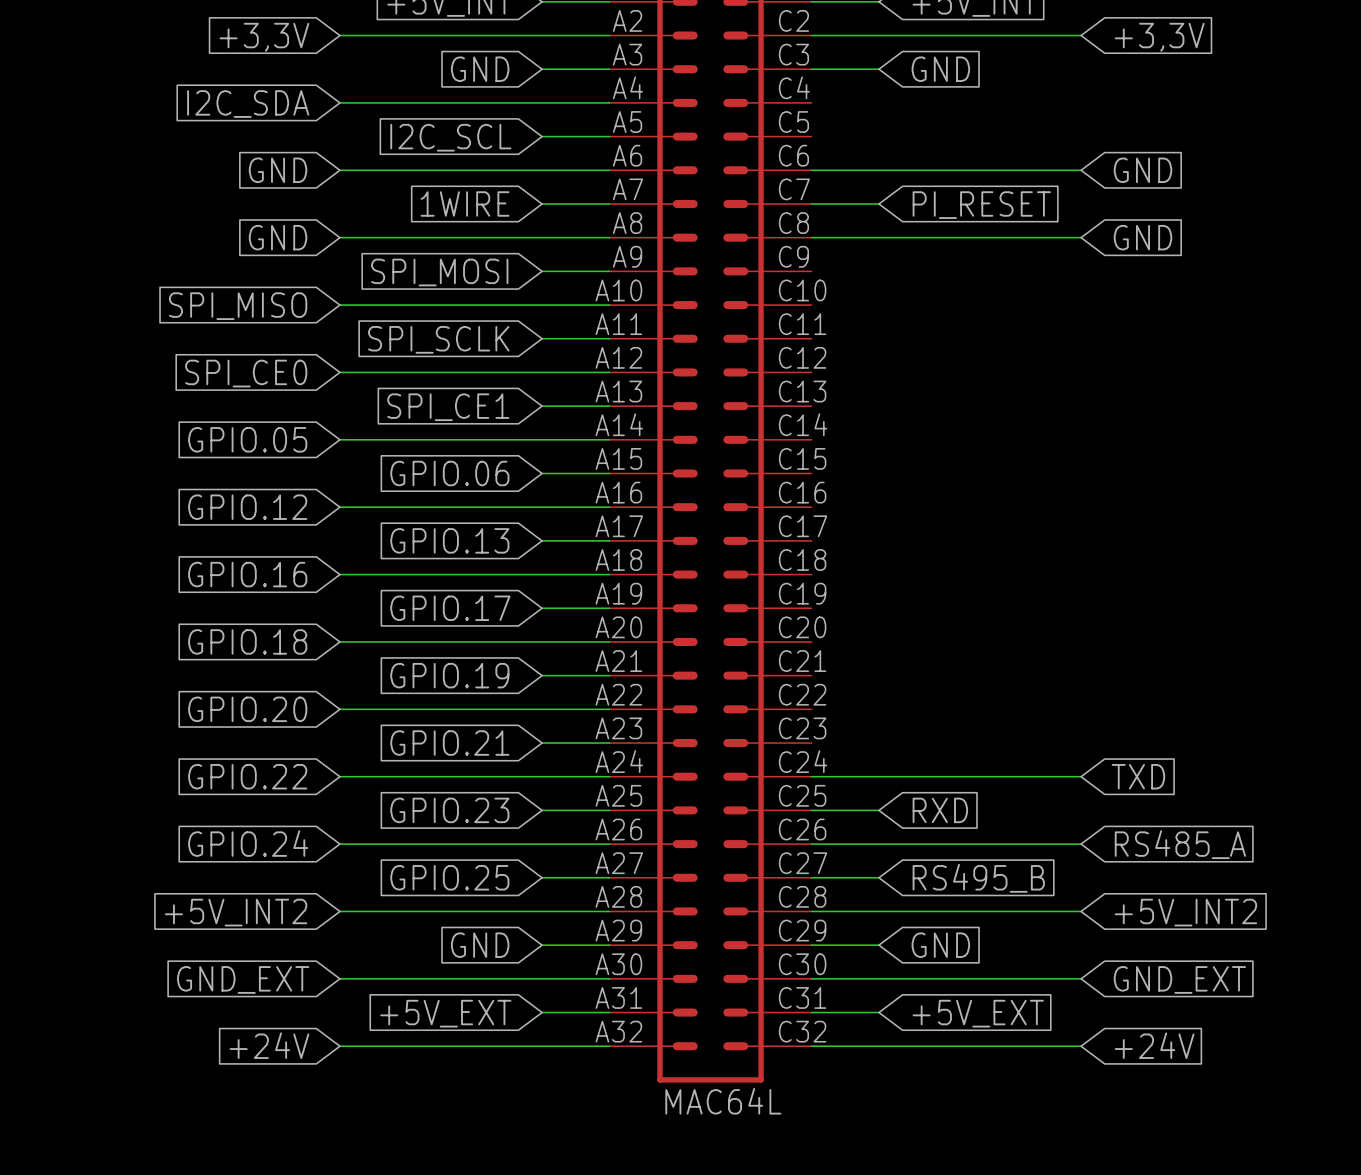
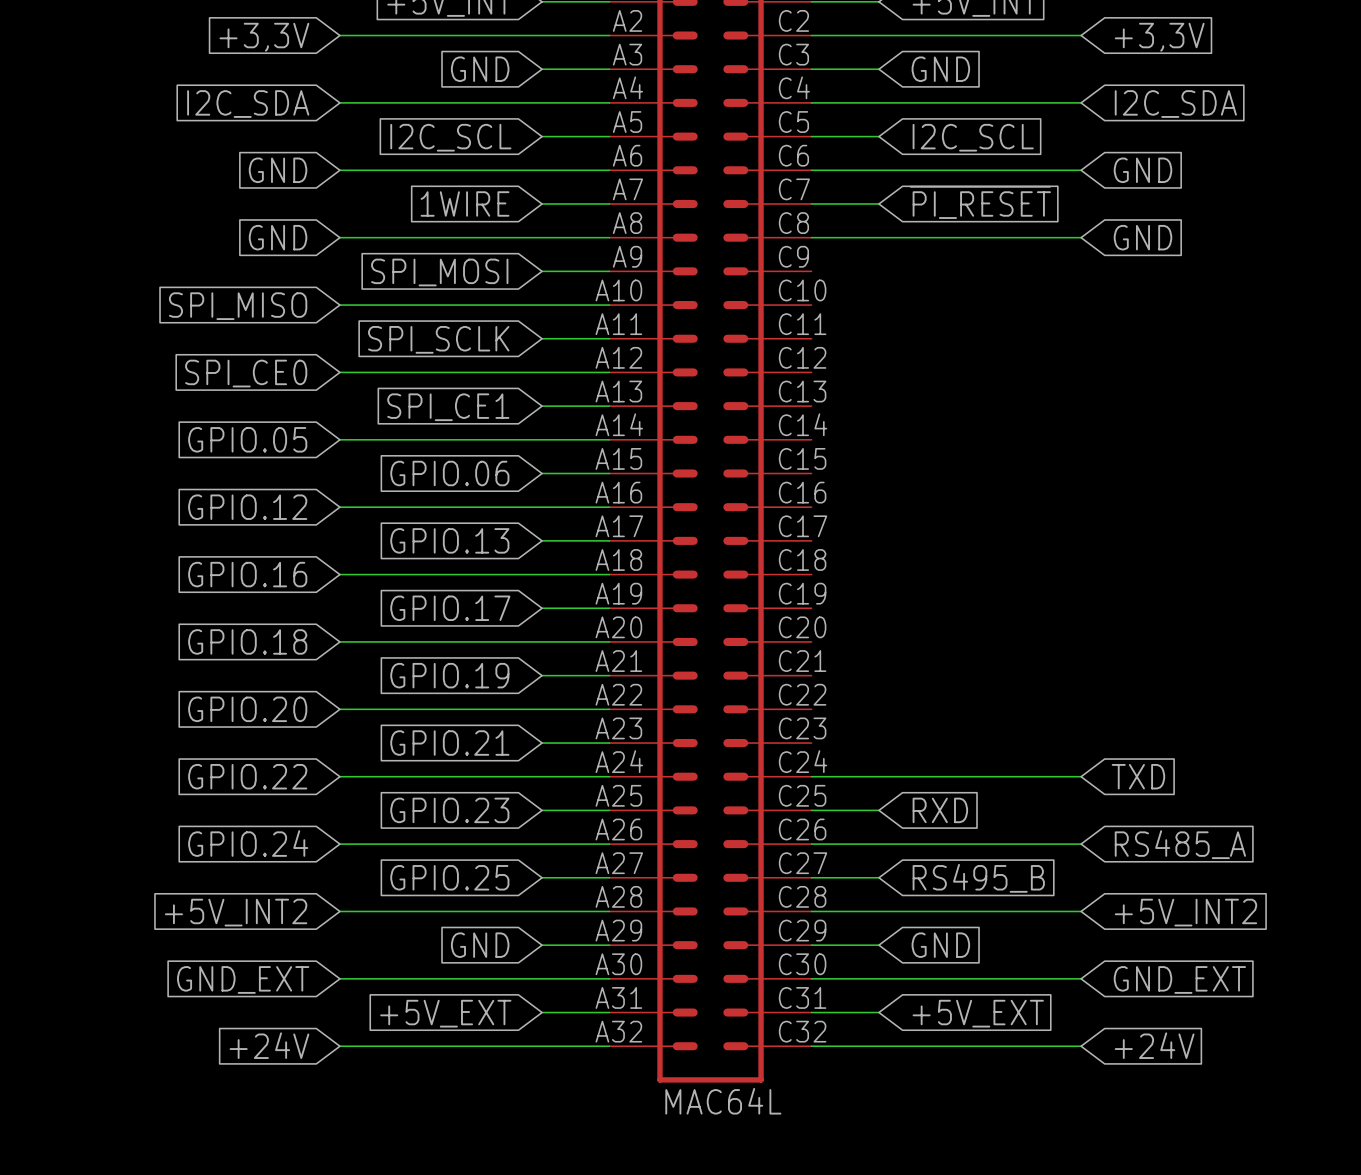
wire: none -> (811, 102) (1081, 102)
global label: none -> I2C_SDA (1175, 104)
wire: none -> (811, 136) (878, 136)
global label: none -> I2C_SCL (973, 137)
global label: PI_RESET (981, 205) -> ~{PI_RESET} (980, 202)

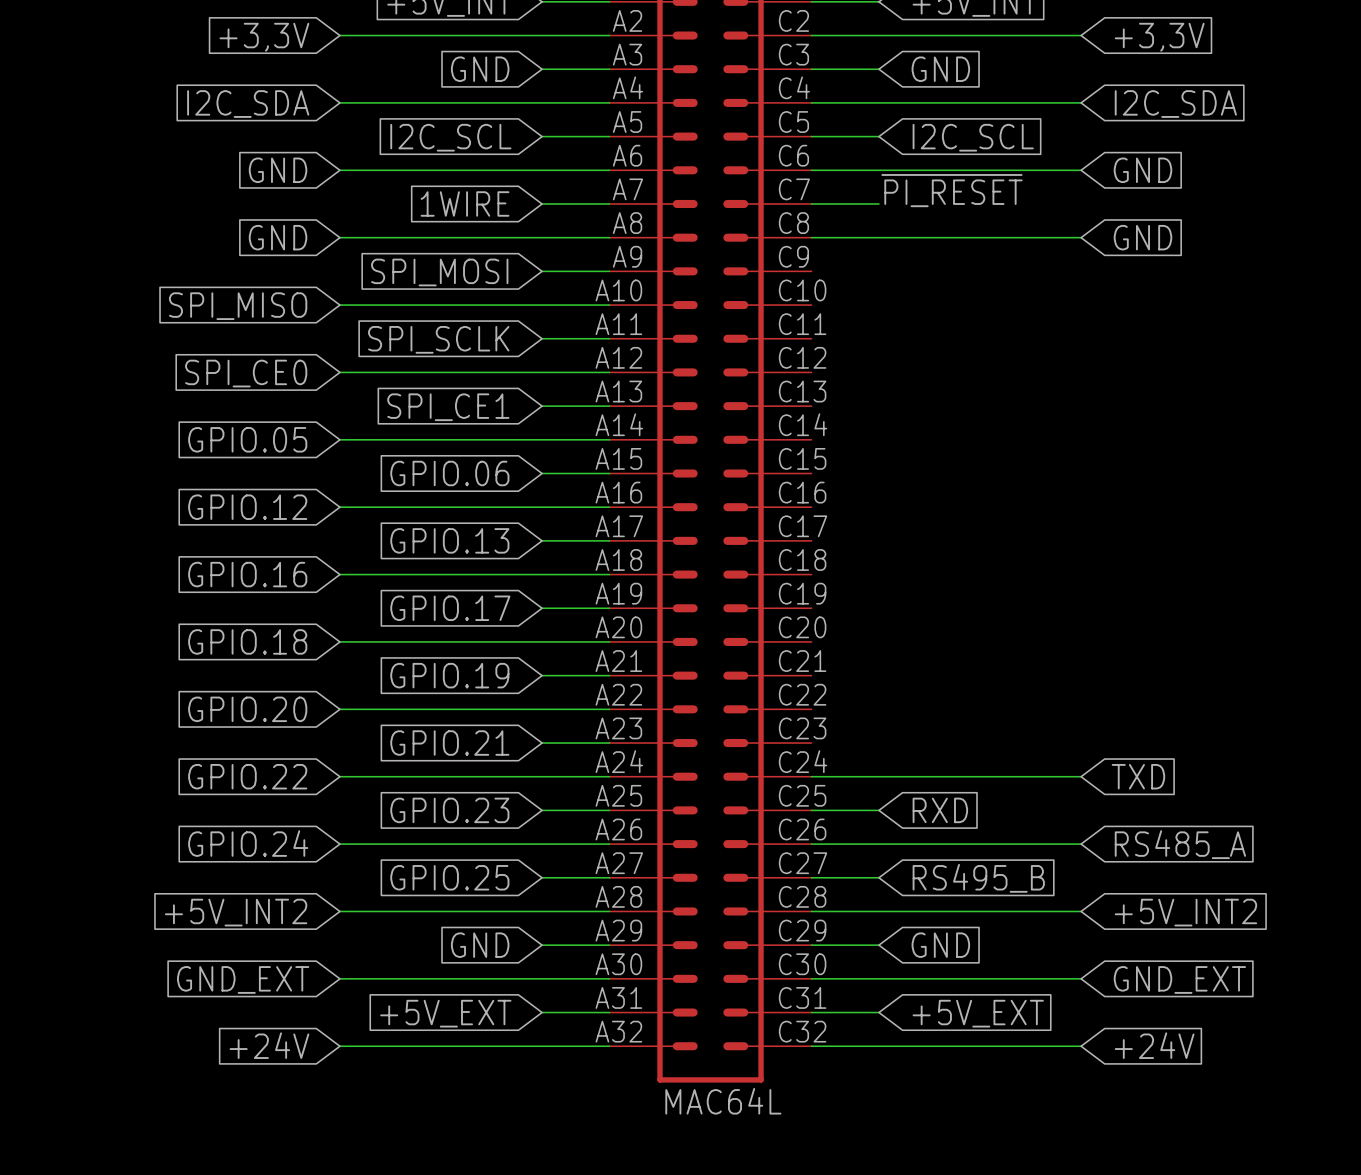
label: none -> ~{PI_RESET} (952, 190)
global label: ~{PI_RESET} (980, 202) -> none

